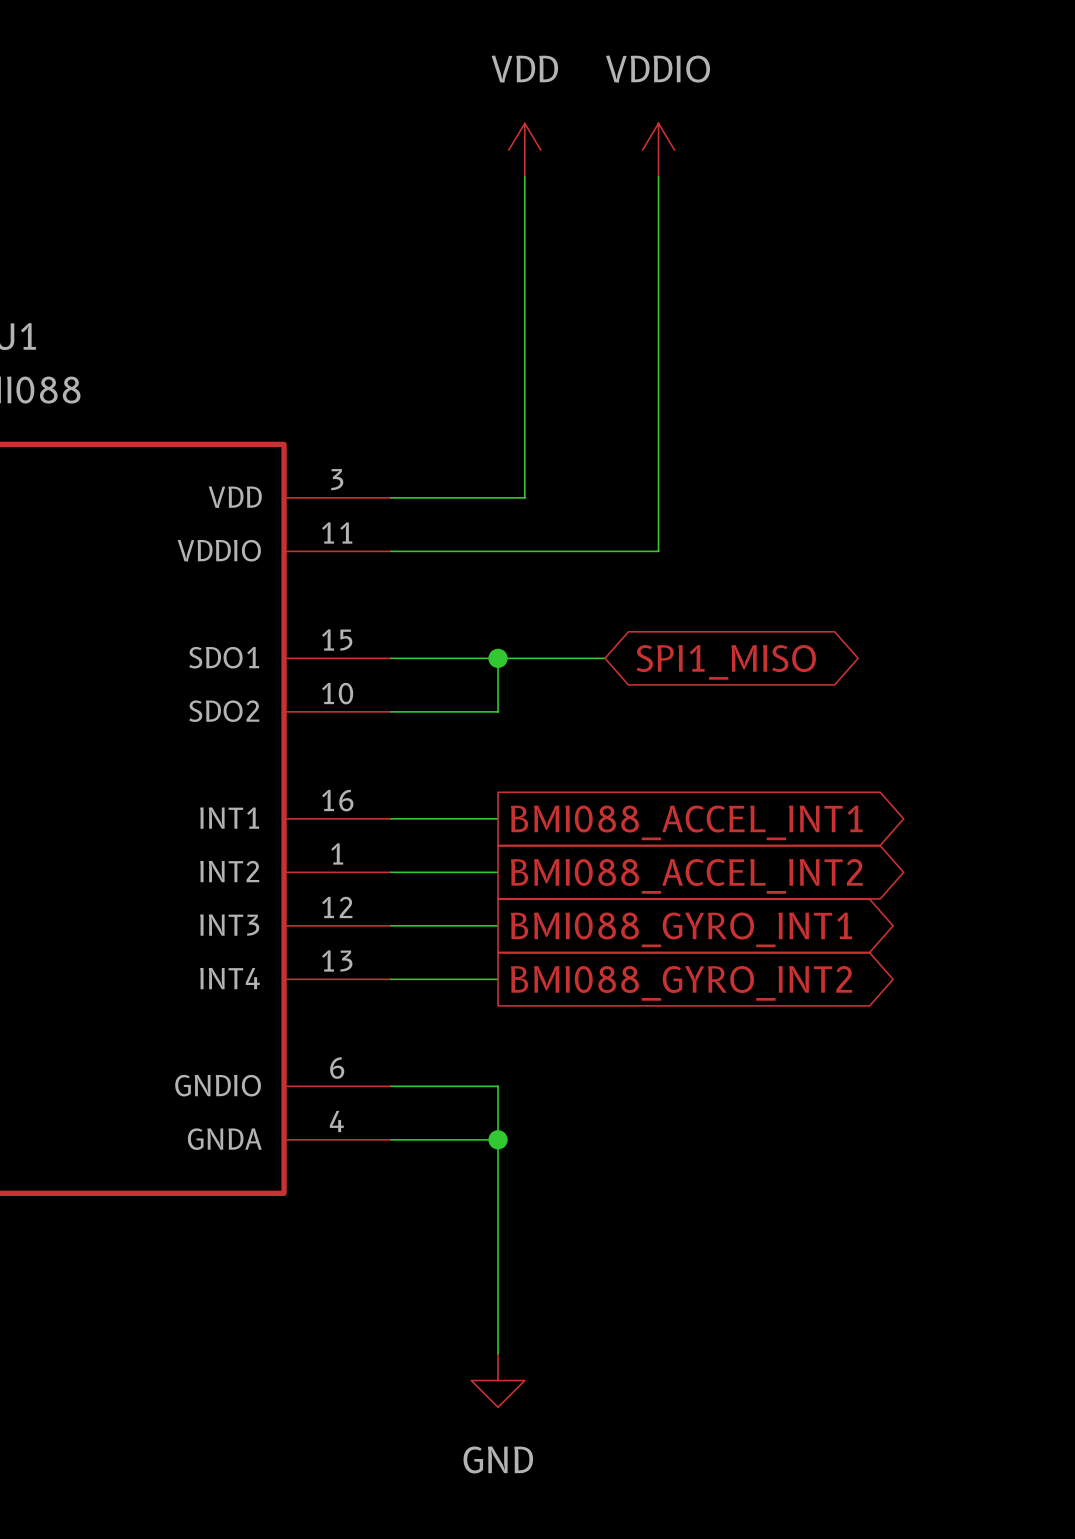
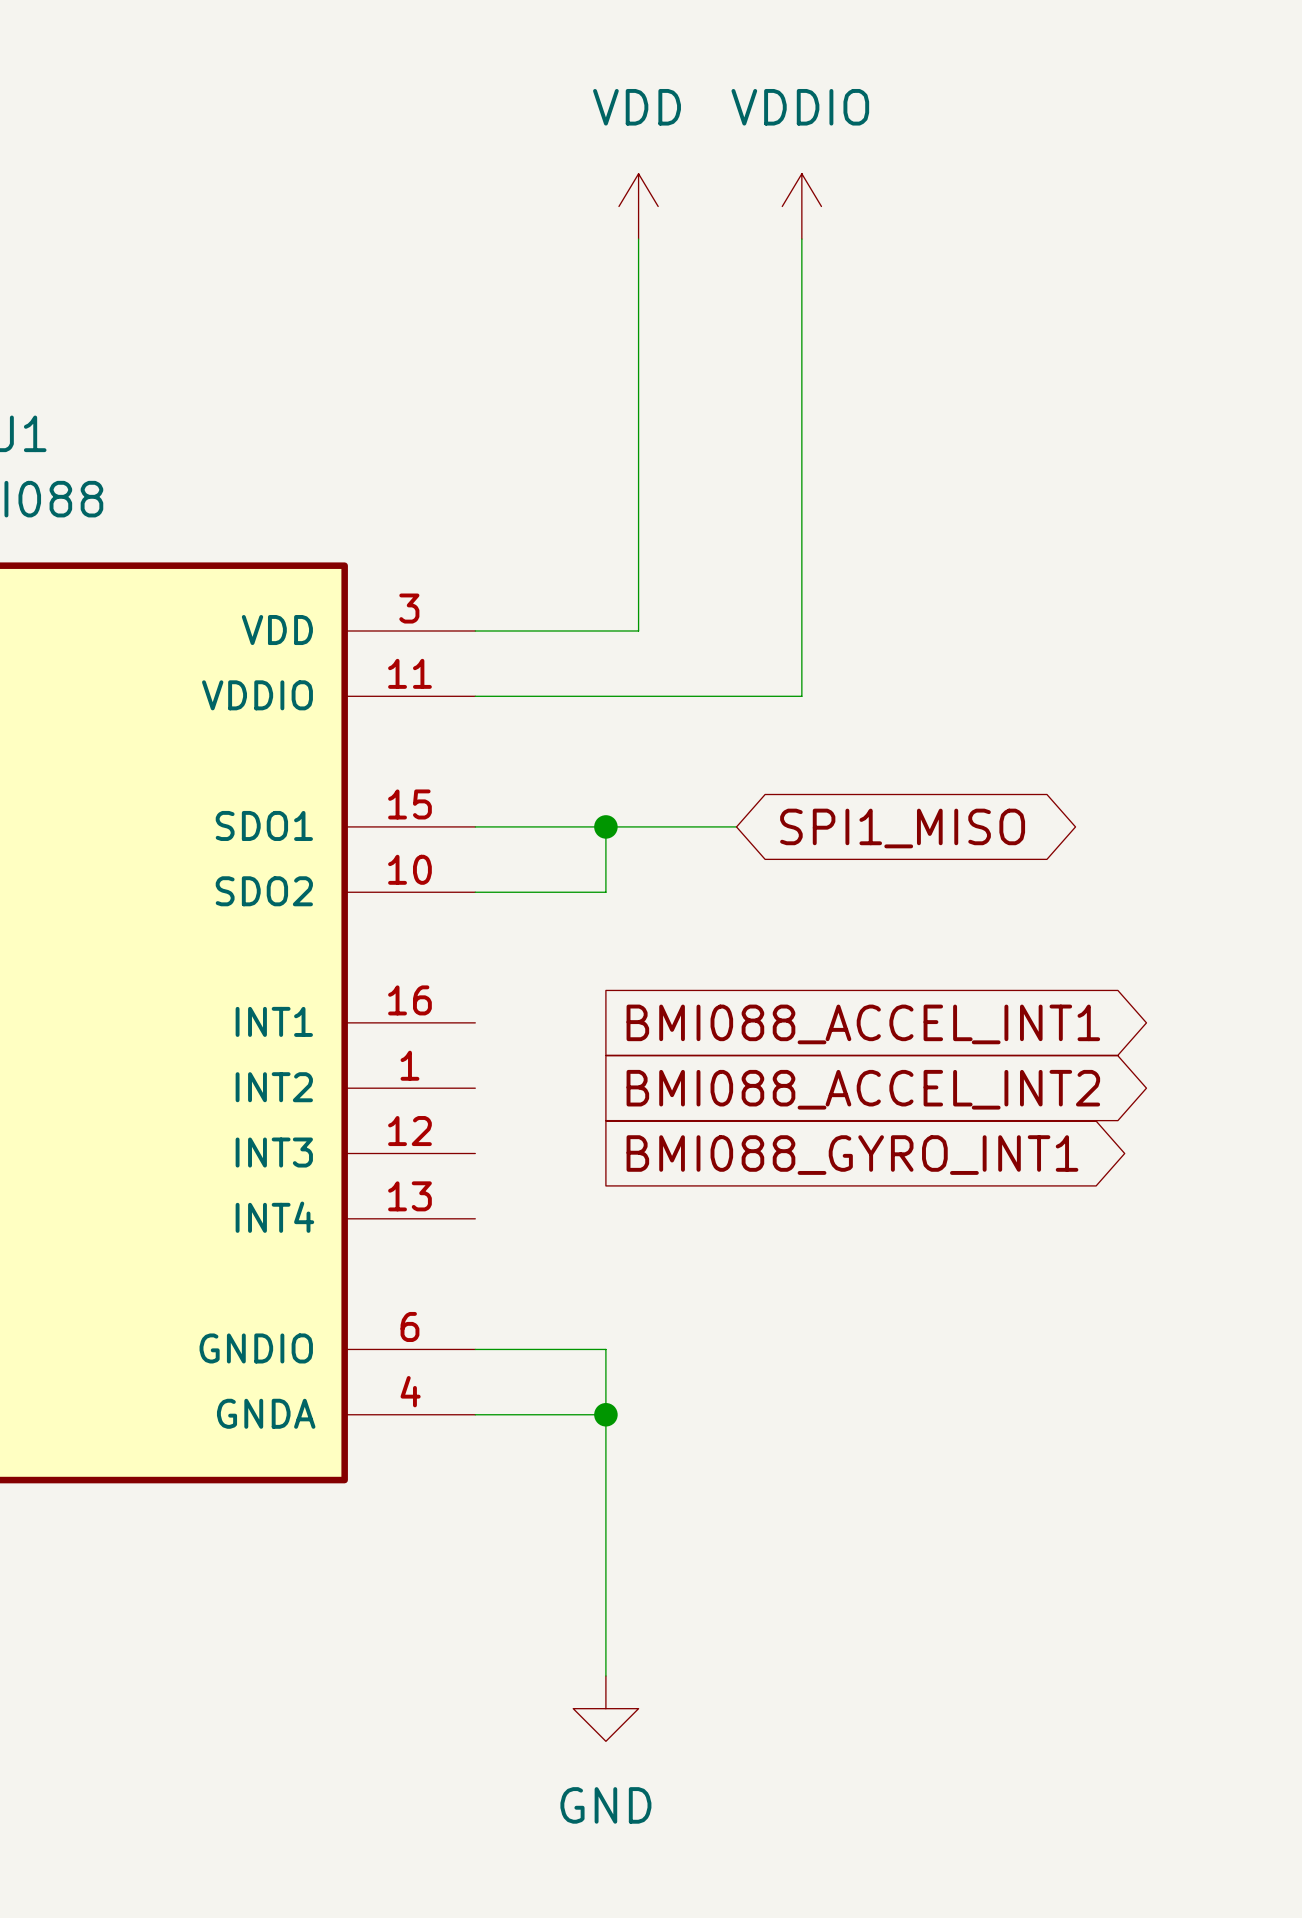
wire: (391, 818) (498, 818) -> none
wire: (391, 872) (498, 872) -> none
wire: (391, 925) (498, 925) -> none
wire: (391, 979) (498, 979) -> none
global label: BMI088_GYRO_INT2 (681, 983) -> none

